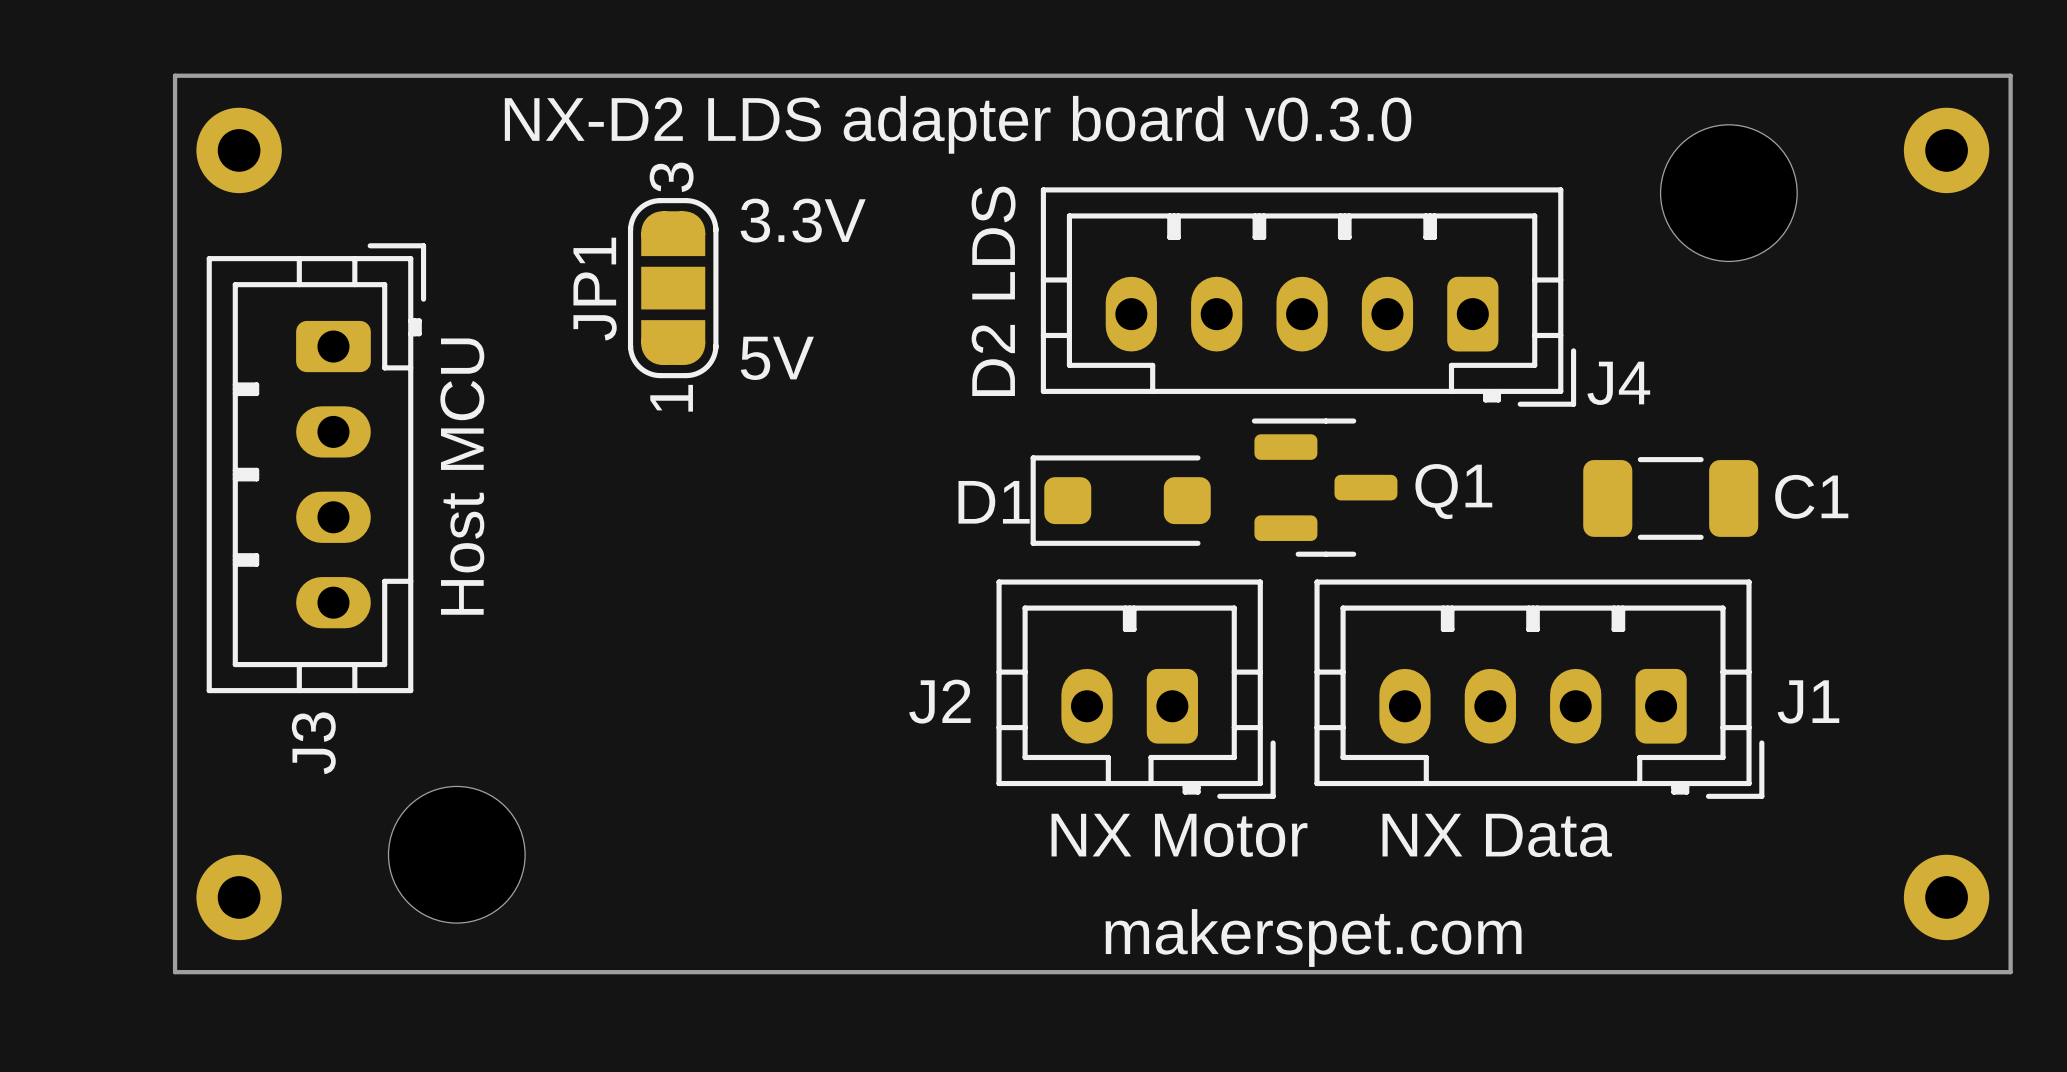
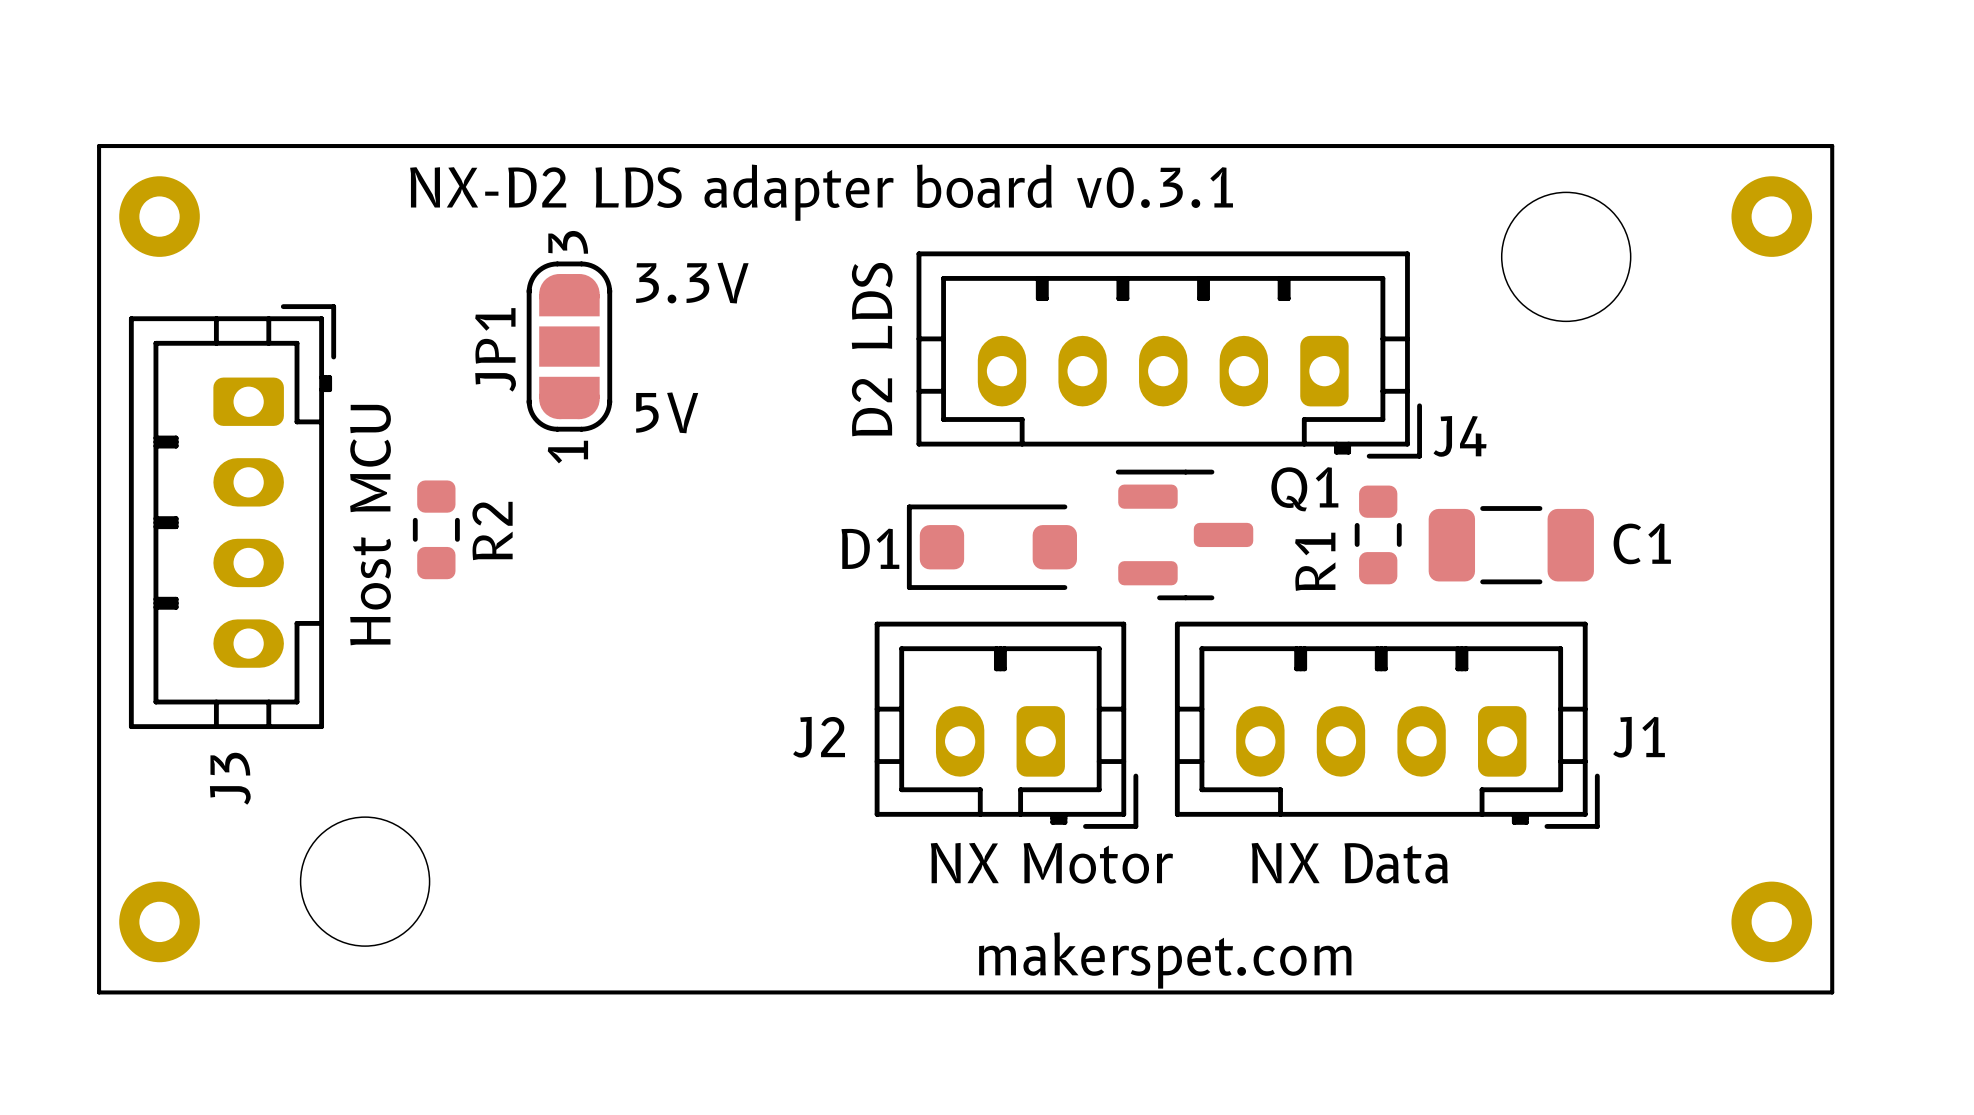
text: NX-D2 LDS adapter board v0.3.0 (958, 124) -> NX-D2 LDS adapter board v0.3.1 (821, 192)
R2: none -> (436, 529)
R1: none -> (1378, 534)
Q1 name position: Q1 (1453, 491) -> Q1 (1304, 489)

